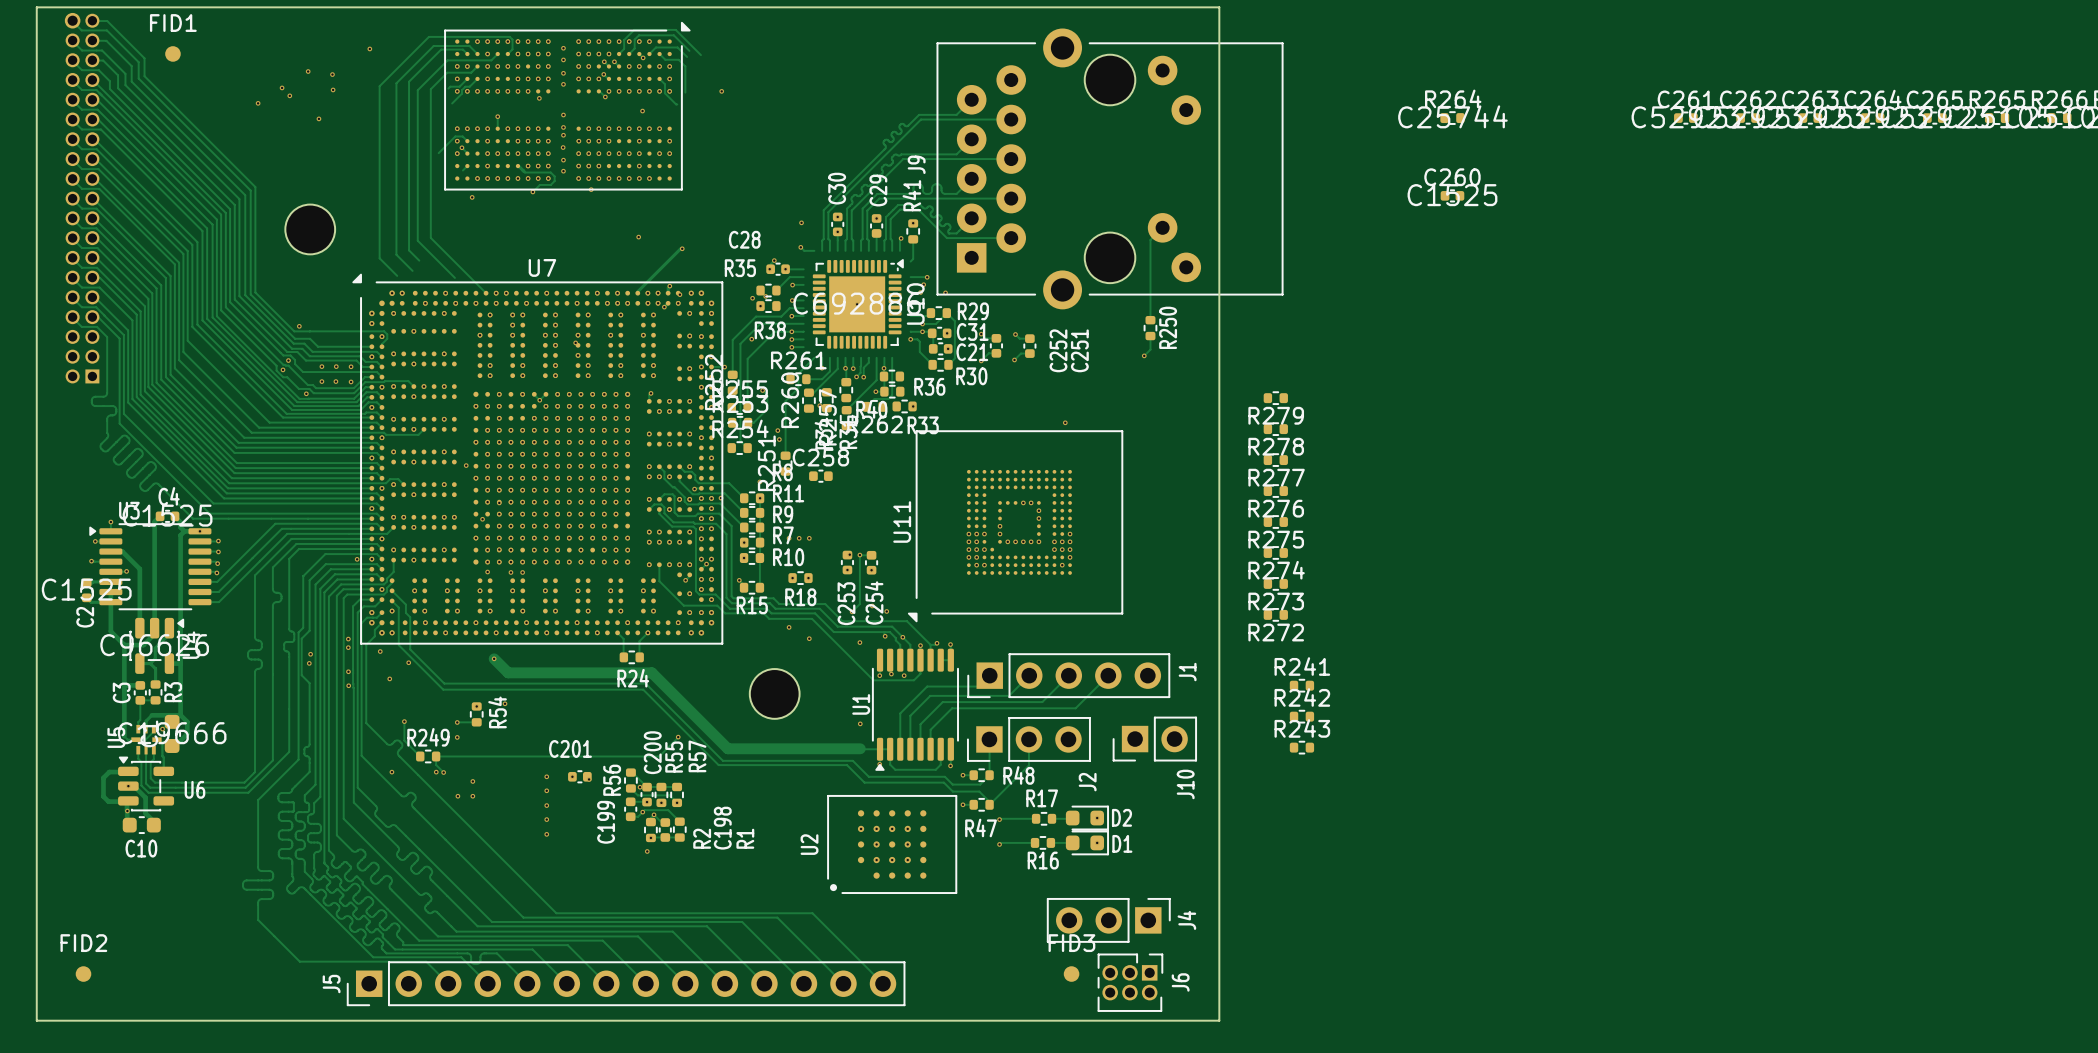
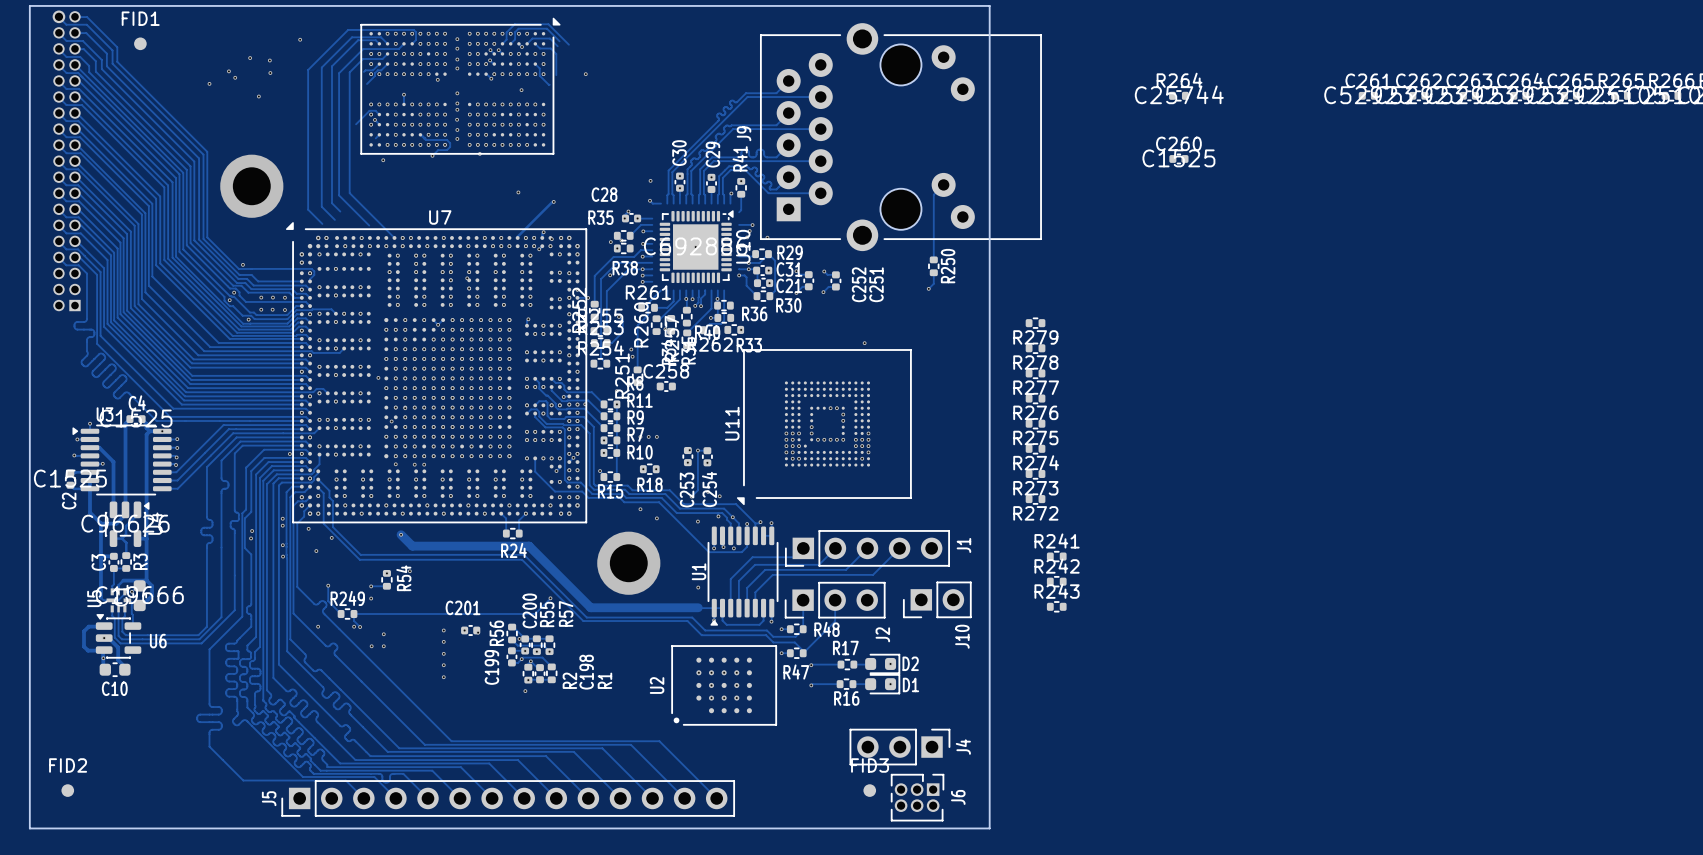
part: (310, 229) -> none
via: none -> (251, 186)
part: (774, 693) -> none
via: none -> (628, 563)

